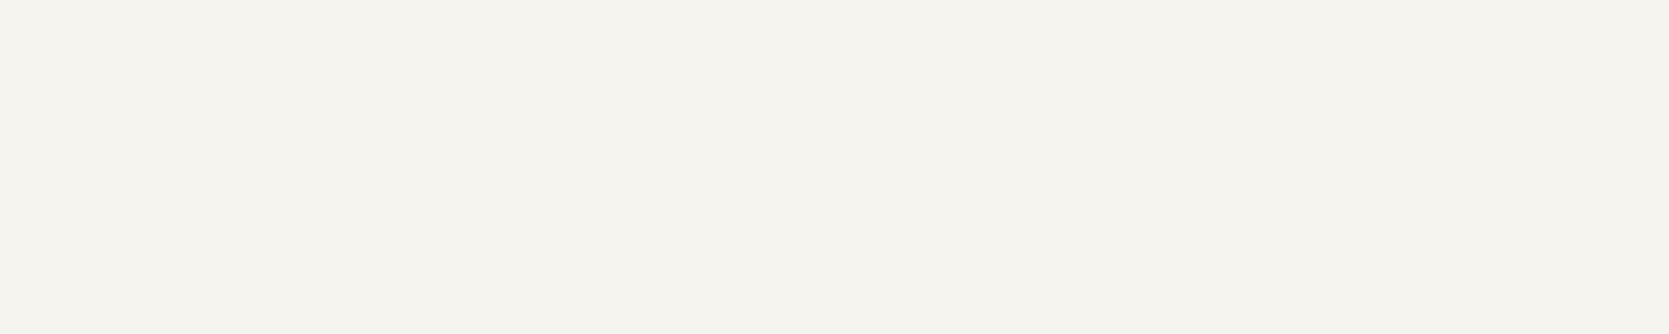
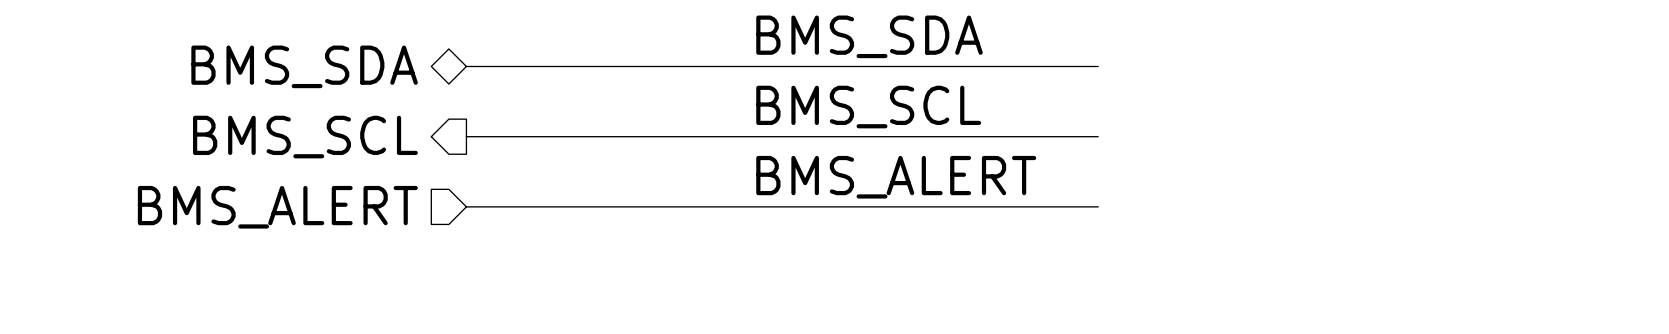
label: none -> BMS_SDA (869, 36)
hierarchical label: none -> BMS_SDA (304, 66)
wire: none -> (466, 66) (1098, 66)
label: none -> BMS_SCL (868, 107)
wire: none -> (466, 136) (1098, 136)
hierarchical label: none -> BMS_SCL (305, 137)
label: none -> BMS_ALERT (896, 177)
wire: none -> (466, 206) (1098, 206)
hierarchical label: none -> BMS_ALERT (277, 207)

